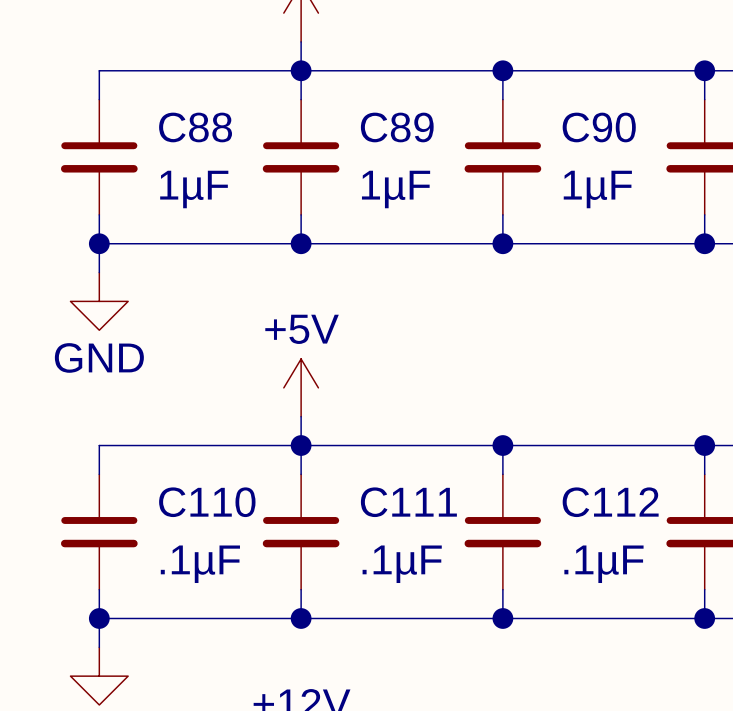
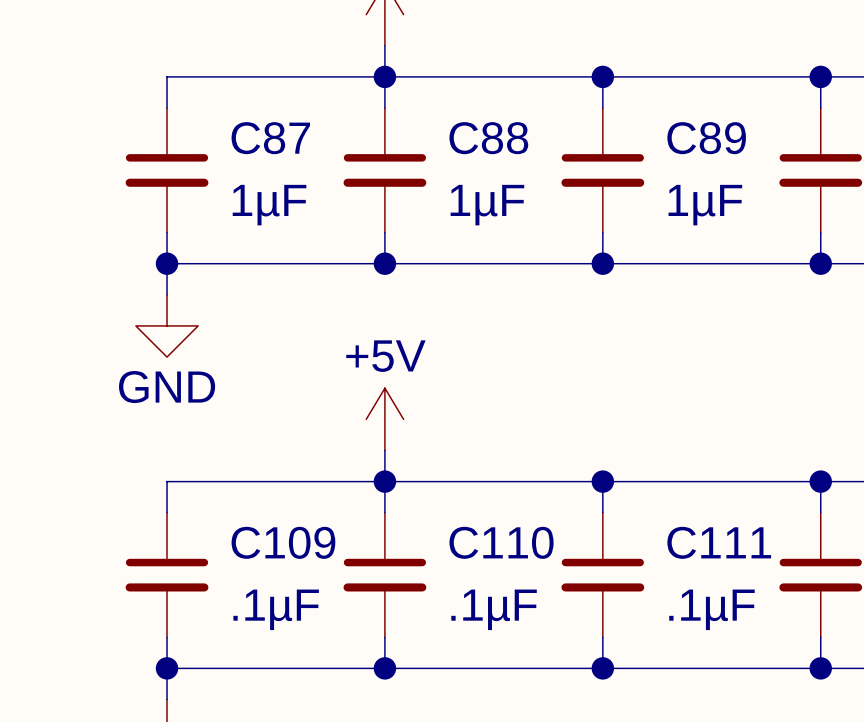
C88 name: C88 (195, 127) -> C87 (270, 138)
C89 name: C89 (397, 127) -> C88 (488, 138)
C90 name: C90 (599, 127) -> C89 (706, 138)
C110 name: C110 (207, 502) -> C109 (283, 542)
C111 name: C111 (408, 502) -> C110 (501, 542)
C112 name: C112 (610, 502) -> C111 (719, 542)

